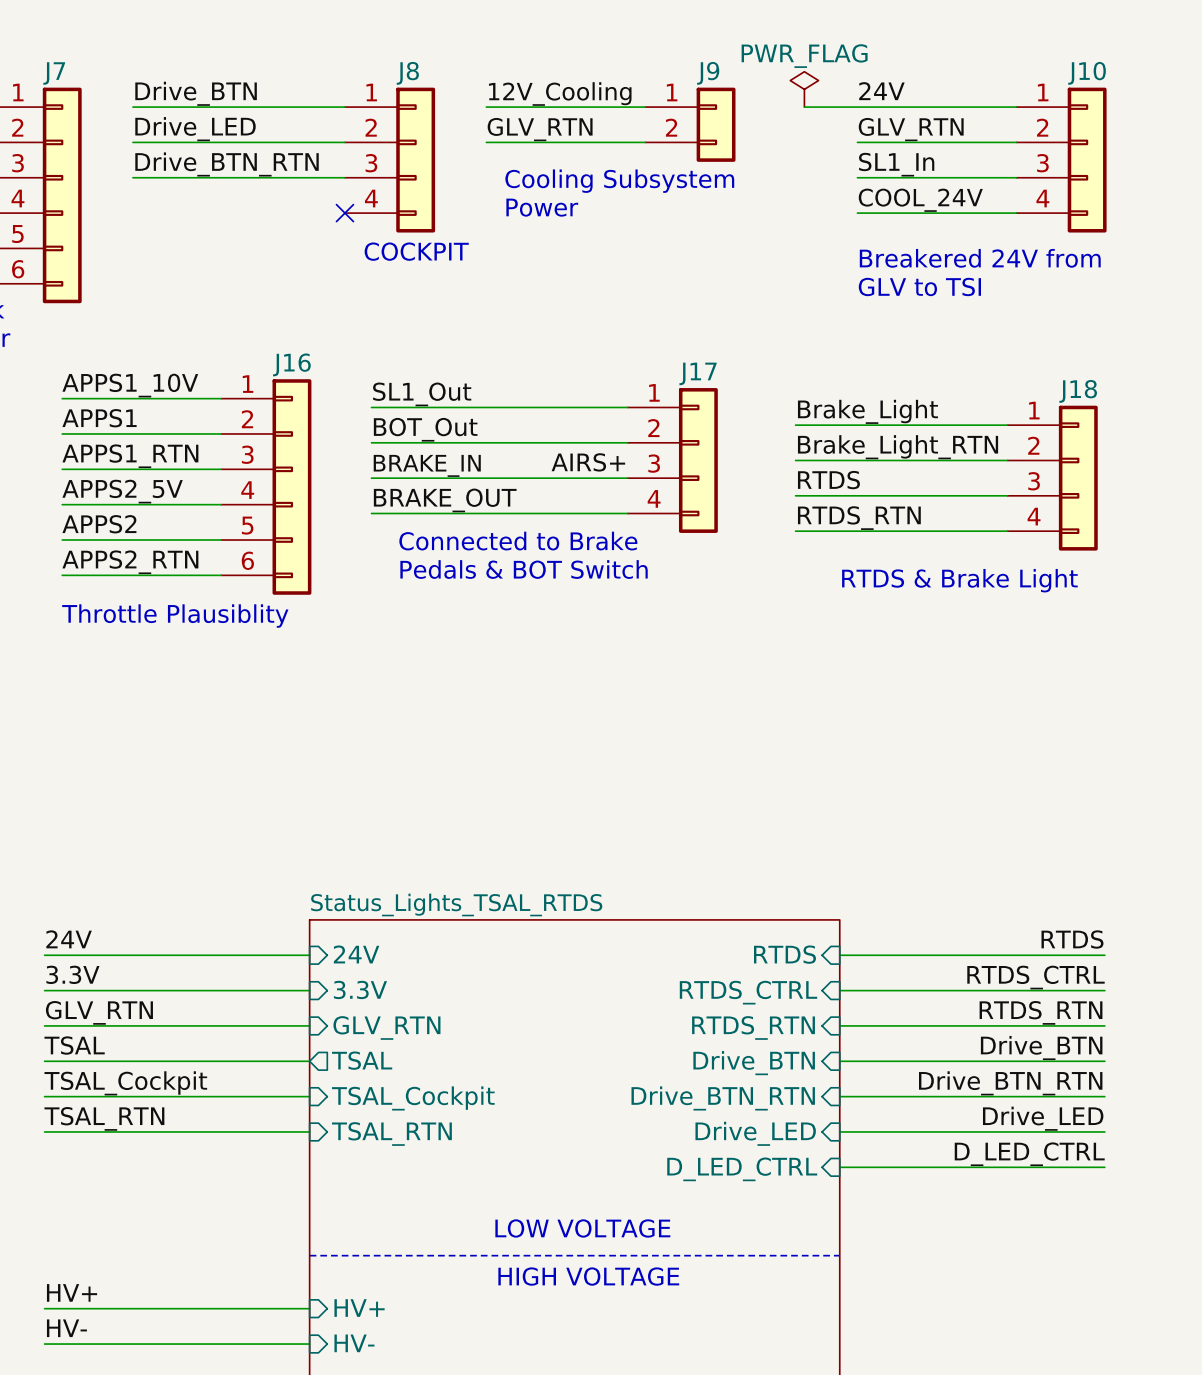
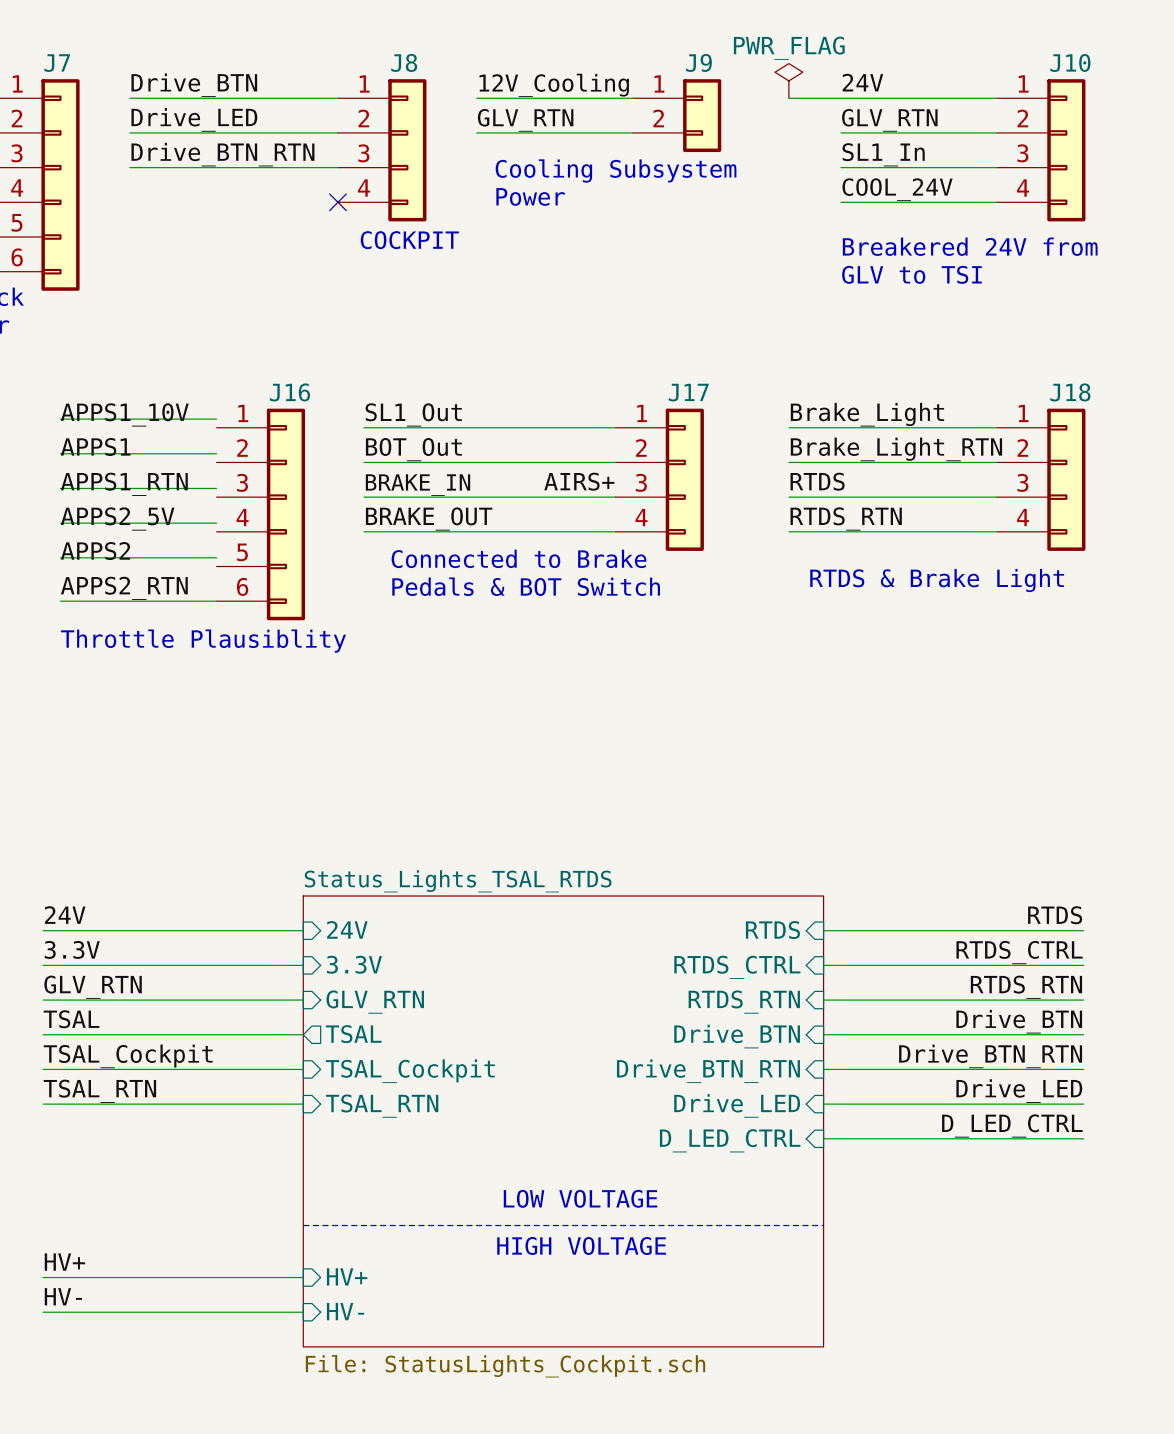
label position: APPS1_10V (130, 385) -> APPS1_10V (124, 414)
label: SL1_Out (422, 394) -> none
wire: (62, 398) (221, 398) -> (60, 601) (216, 601)
wire: (371, 407) (627, 407) -> (364, 531) (615, 531)
label position: Brake_Light (867, 411) -> Brake_Light (867, 414)
label position: APPS1 (99, 418) -> APPS1 (95, 446)
wire: (795, 425) (1007, 425) -> (788, 427) (996, 427)
label: BOT_Out (425, 429) -> SL1_Out (413, 414)
label position: Brake_Light_RTN (898, 447) -> Brake_Light_RTN (896, 449)
label position: APPS1_RTN (130, 456) -> APPS1_RTN (124, 484)
J17 position: (672, 460) -> (659, 479)
wire: (795, 460) (1007, 460) -> (788, 462) (996, 462)
label position: AIRS+ (588, 462) -> AIRS+ (579, 481)
label: BRAKE_IN (427, 465) -> BOT_Out (413, 449)
J18 position: (1052, 478) -> (1041, 479)
label position: RTDS (828, 480) -> RTDS (817, 481)
J16 position: (266, 486) -> (260, 514)
label position: APPS2_5V (122, 491) -> APPS2_5V (117, 518)
wire: (795, 495) (1007, 495) -> (788, 497) (996, 497)
label: BRAKE_OUT (445, 500) -> BRAKE_IN (417, 485)
label position: RTDS_RTN (859, 518) -> RTDS_RTN (846, 518)
label position: APPS2 (99, 524) -> APPS2 (95, 551)
wire: (795, 531) (1007, 531) -> (788, 531) (996, 531)
label: none -> BRAKE_OUT (429, 518)
text position: Connected to Brake (518, 541) -> Connected to Brake (519, 558)
label position: APPS2_RTN (130, 562) -> APPS2_RTN (124, 588)
text position: Pedals & BOT Switch (524, 569) -> Pedals & BOT Switch (526, 586)
text position: RTDS & Brake Light (959, 580) -> RTDS & Brake Light (937, 580)
text position: Throttle Plausiblity (175, 616) -> Throttle Plausiblity (203, 641)

